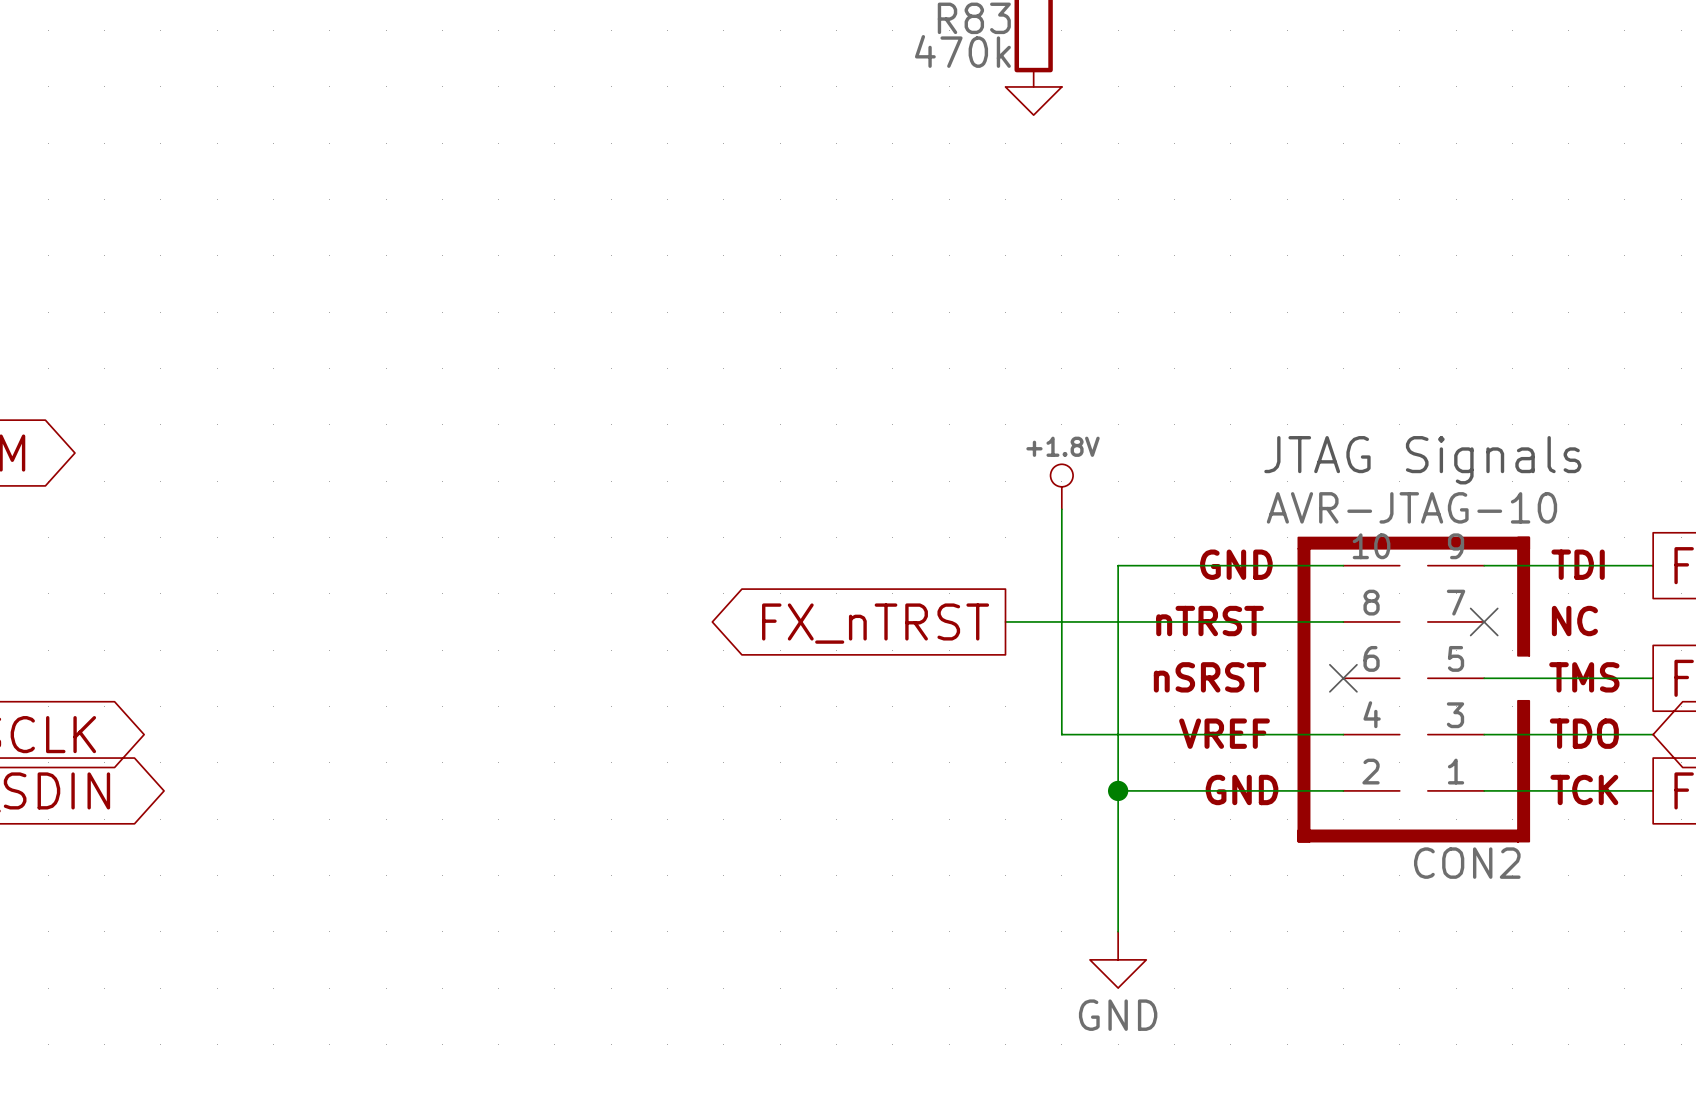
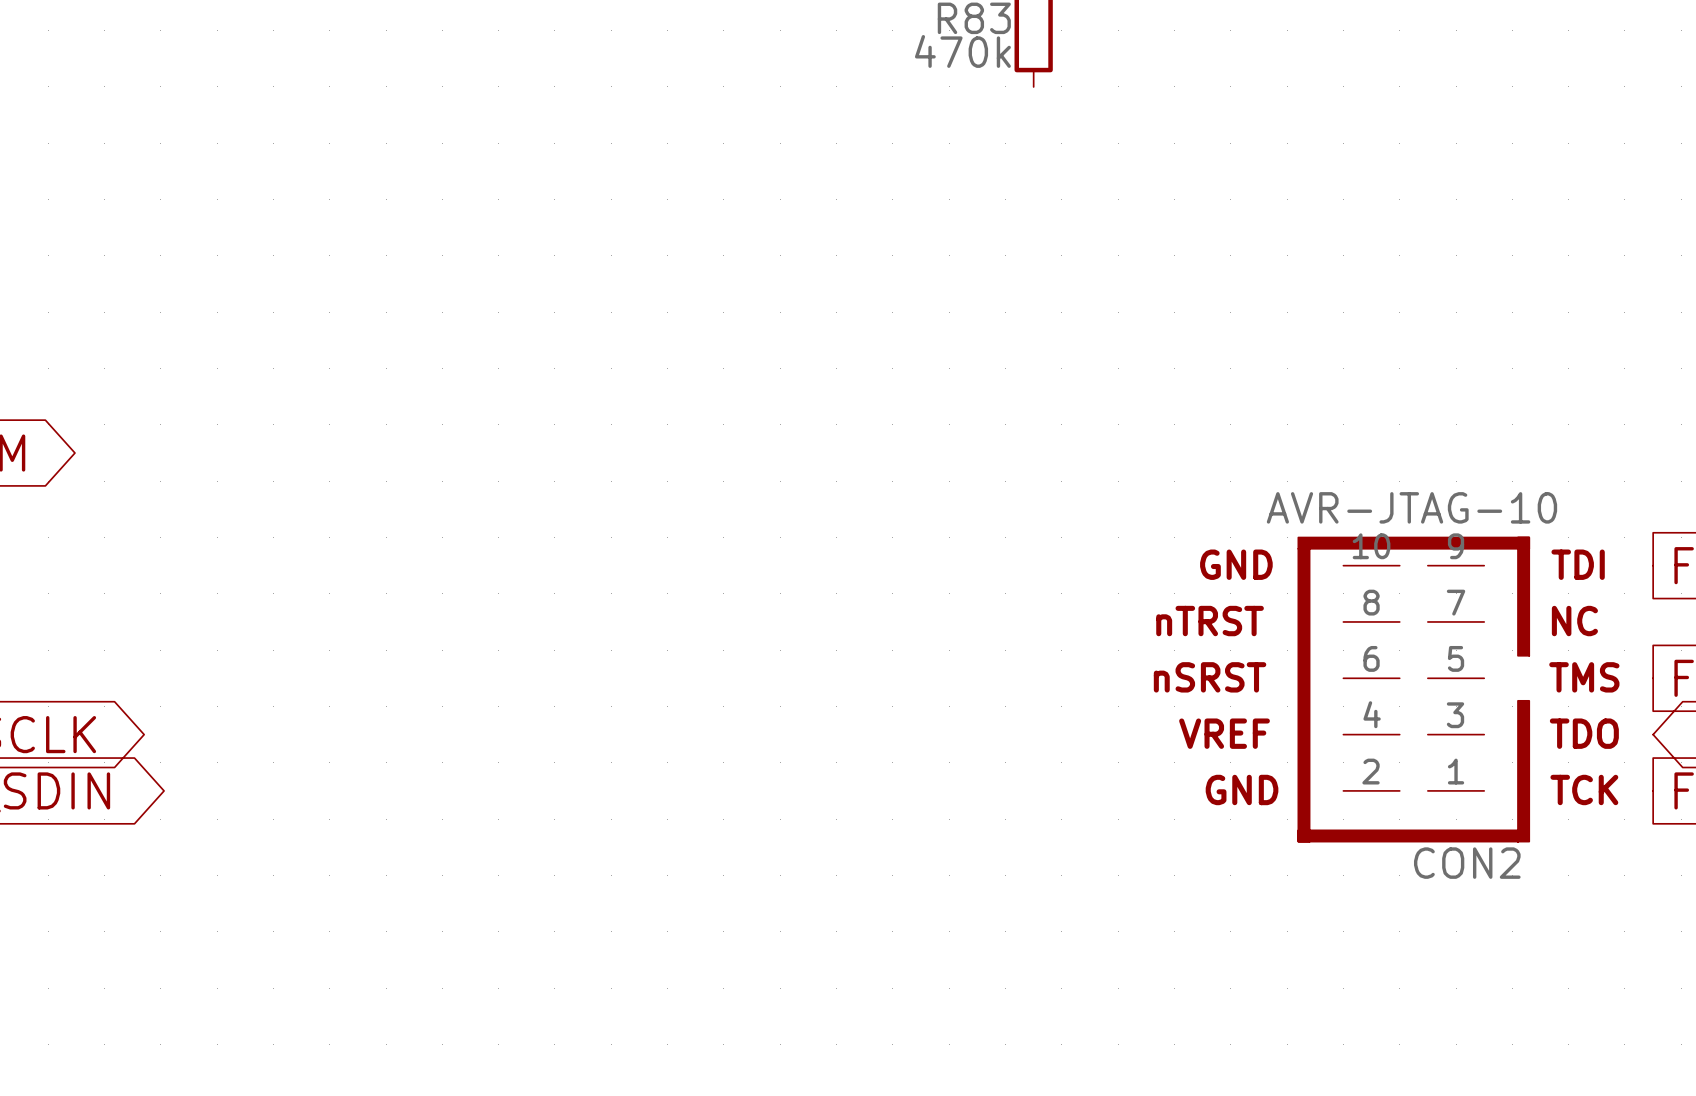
power symbol: (1033, 101) -> none
text: JTAG Signals (1422, 460) -> none
power symbol: +1.8V (1061, 486) -> none
wire: (1061, 509) (1061, 734) (1343, 734) -> none
wire: (1343, 565) (1118, 565) (1118, 931) -> none
wire: (1484, 565) (1653, 565) -> none
wire: (1005, 621) (1343, 621) -> none
no-connect mark: (1484, 621) -> none
global label: FX_nTRST (875, 623) -> none
no-connect mark: (1343, 678) -> none
wire: (1484, 678) (1653, 678) -> none
wire: (1484, 734) (1653, 734) -> none
wire: (1118, 790) (1343, 790) -> none
junction: (1118, 790) -> none
wire: (1484, 790) (1653, 790) -> none
power symbol: GND (1118, 959) -> none

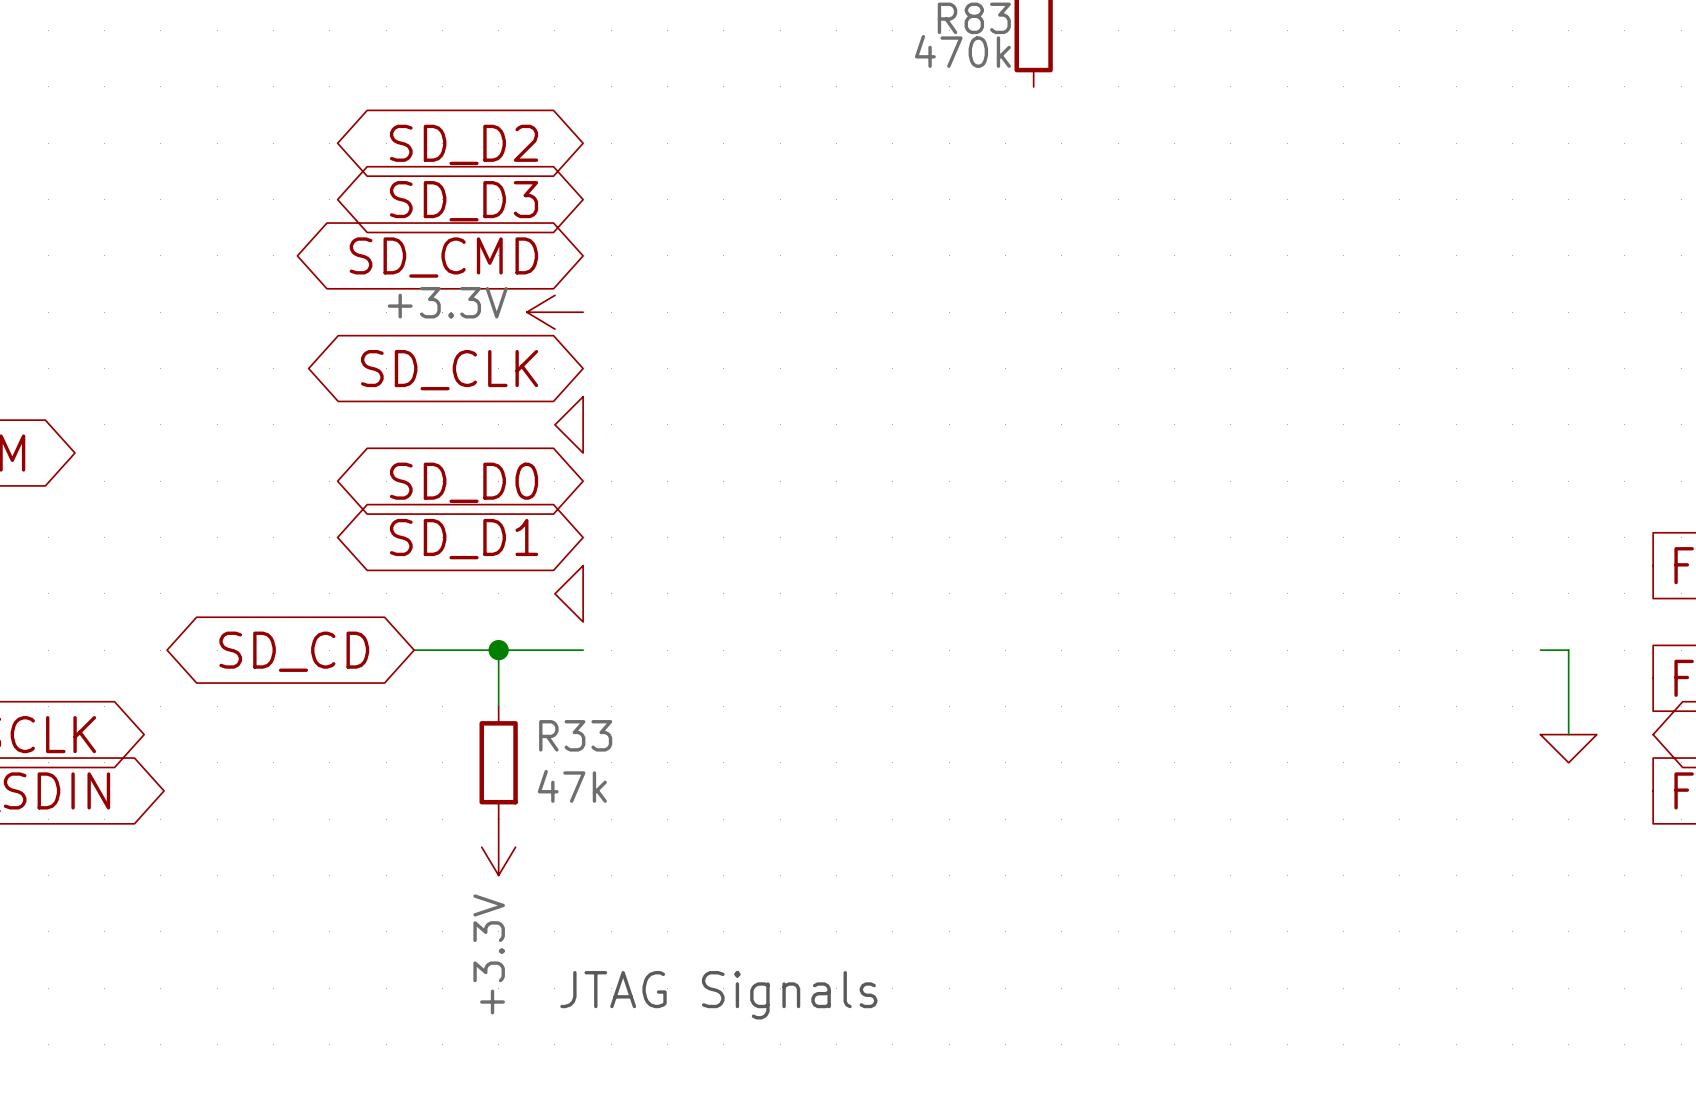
global label: none -> SD_D2 (464, 144)
global label: none -> SD_D3 (464, 201)
global label: none -> SD_CMD (443, 257)
power symbol: none -> +3.3V (554, 312)
global label: none -> SD_CLK (449, 370)
power symbol: none -> (569, 424)
global label: none -> SD_D0 (464, 482)
global label: none -> SD_D1 (464, 539)
power symbol: none -> (569, 593)
wire: none -> (414, 650) (583, 650)
wire: none -> (498, 650) (498, 706)
junction: none -> (498, 650)
wire: none -> (1540, 650) (1568, 650) (1568, 734)
global label: none -> SD_CD (294, 651)
CON2: AVR-JTAG-10 (1413, 689) -> none
power symbol: none -> (1568, 748)
R33: none -> 47k (498, 762)
power symbol: none -> +3.3V (498, 847)
text: none -> JTAG Signals (718, 995)

